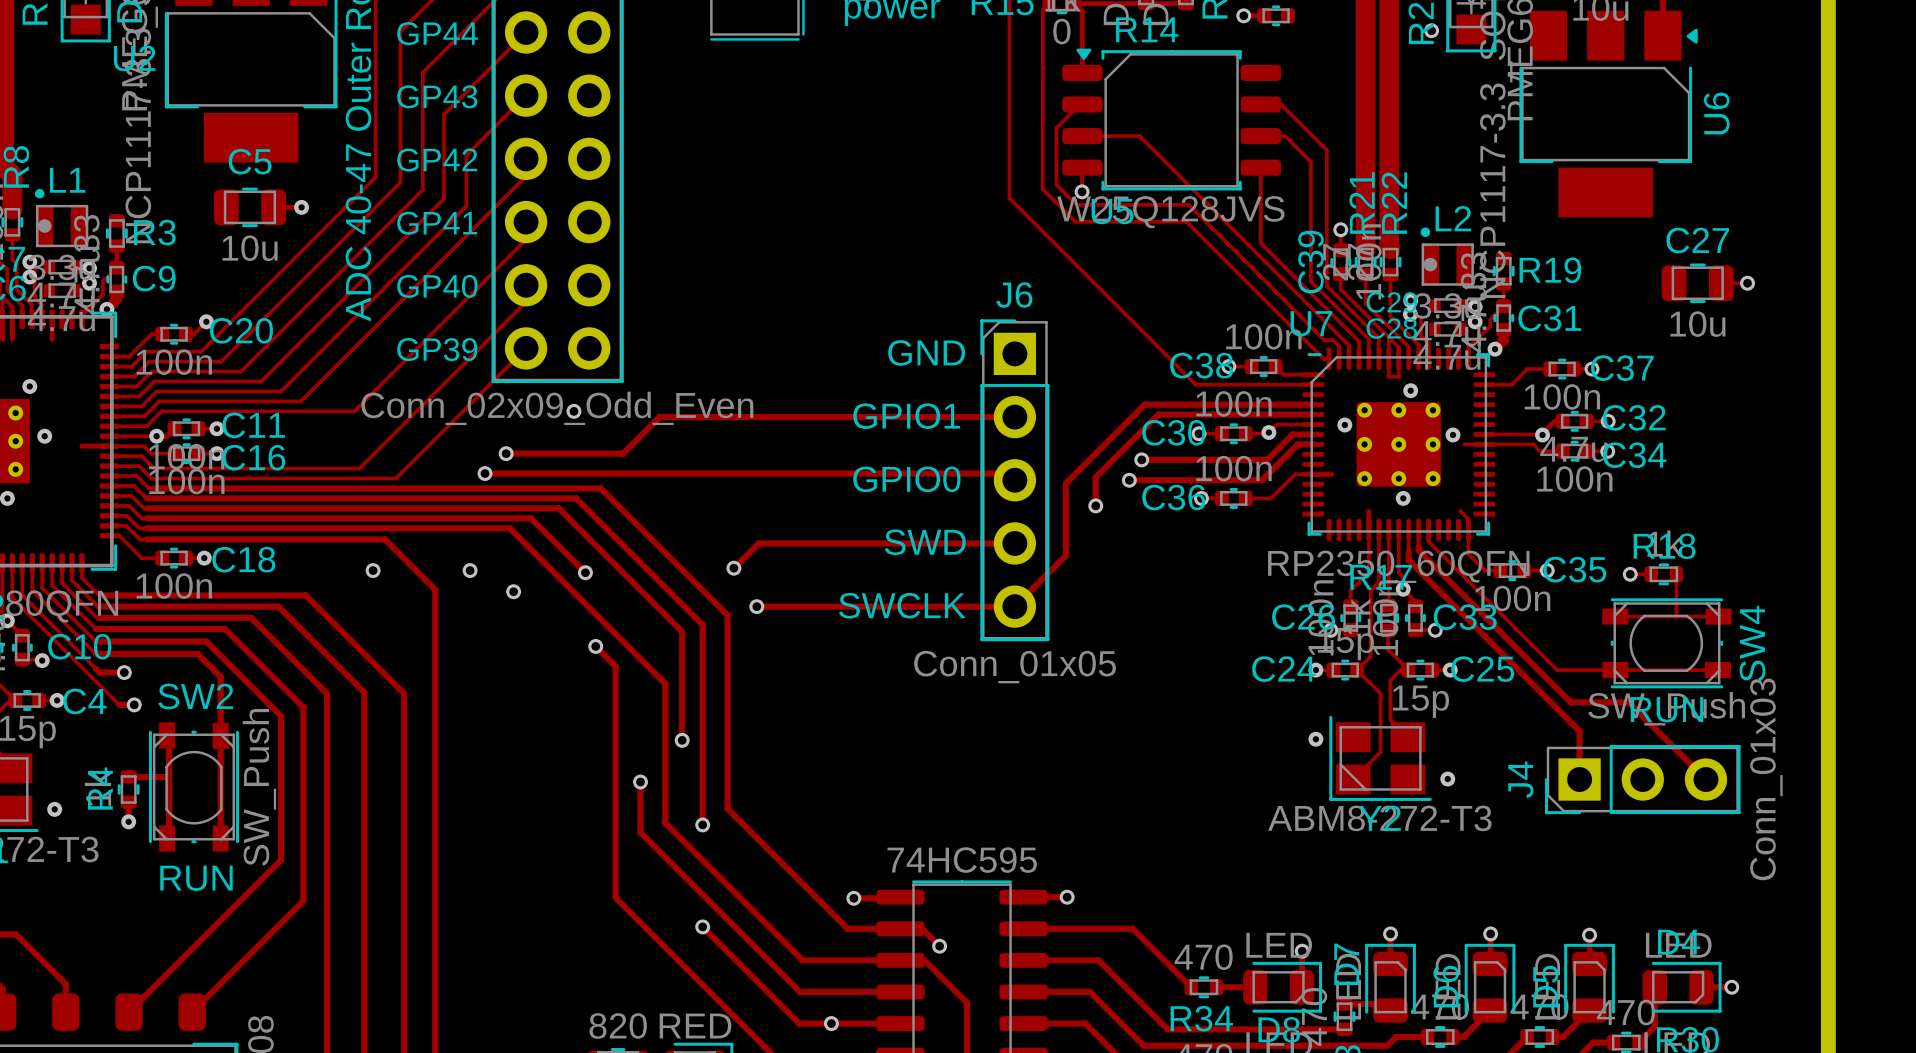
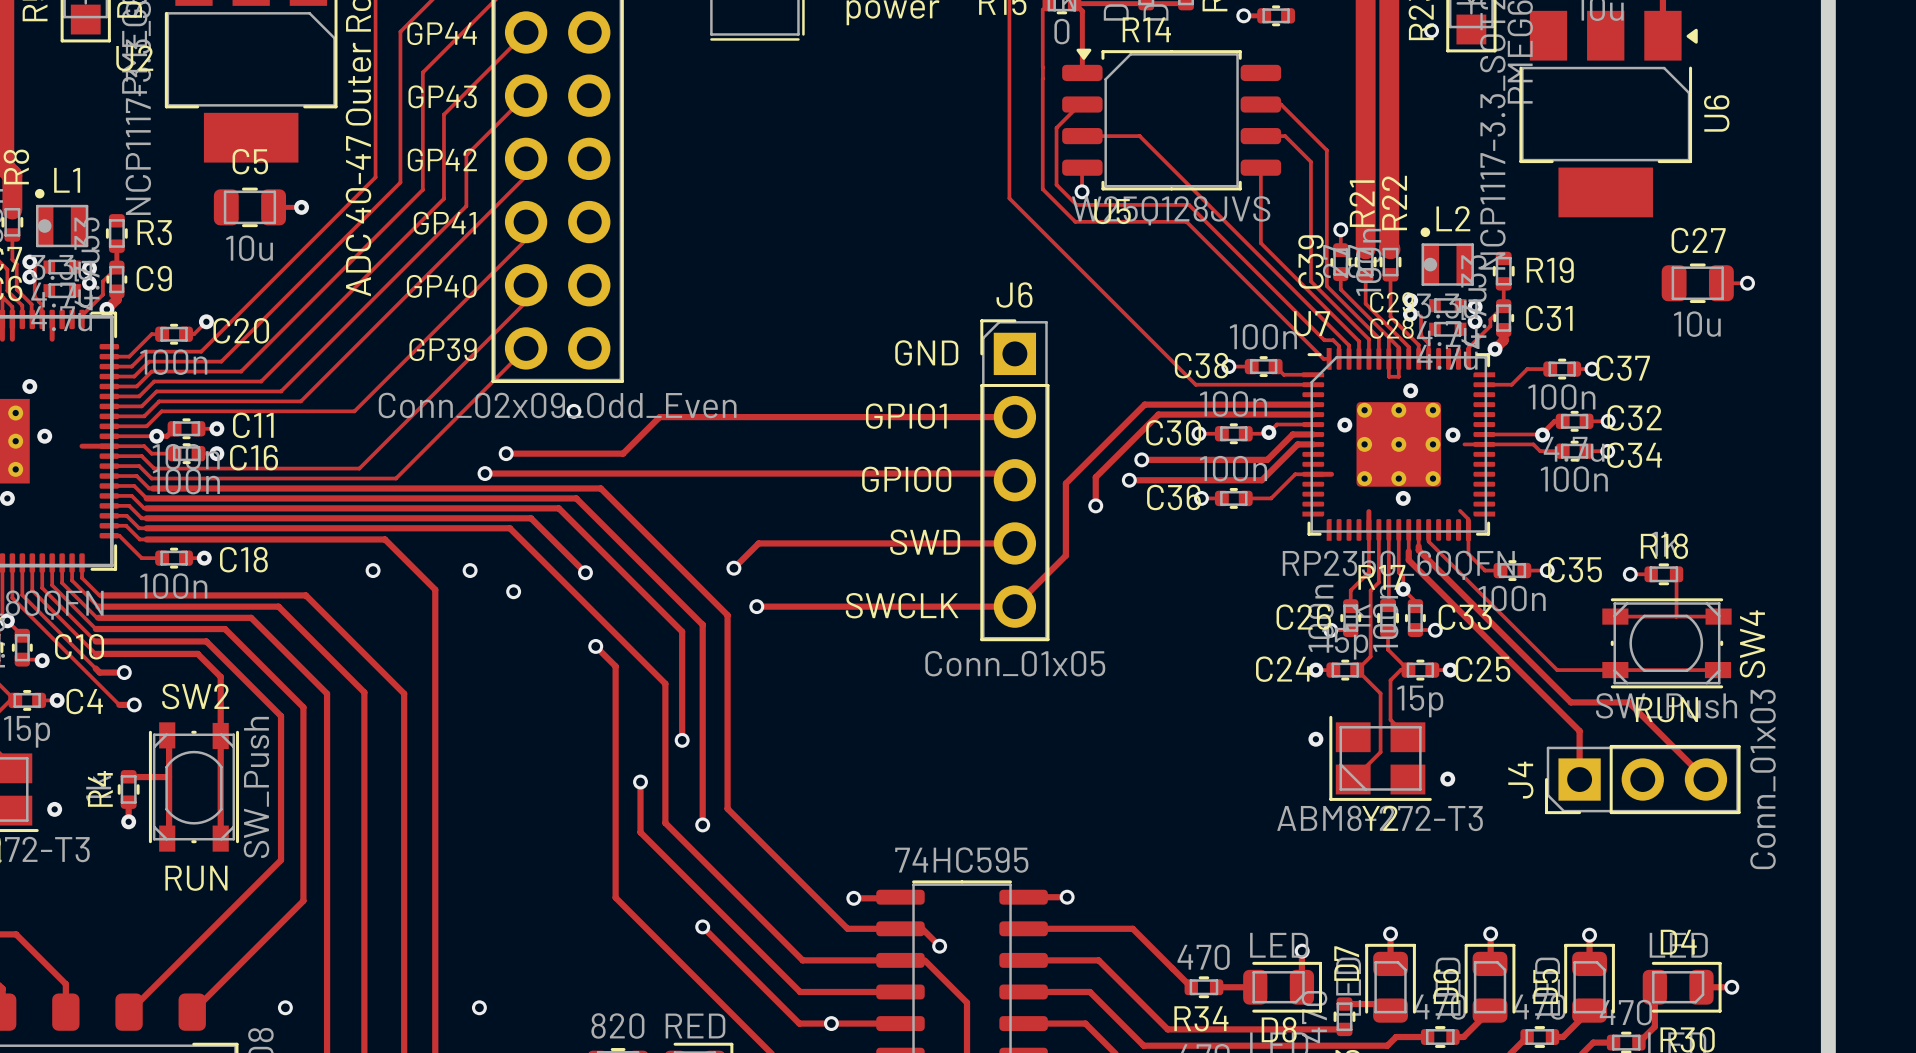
via: none -> (285, 1007)
via: none -> (479, 1007)

